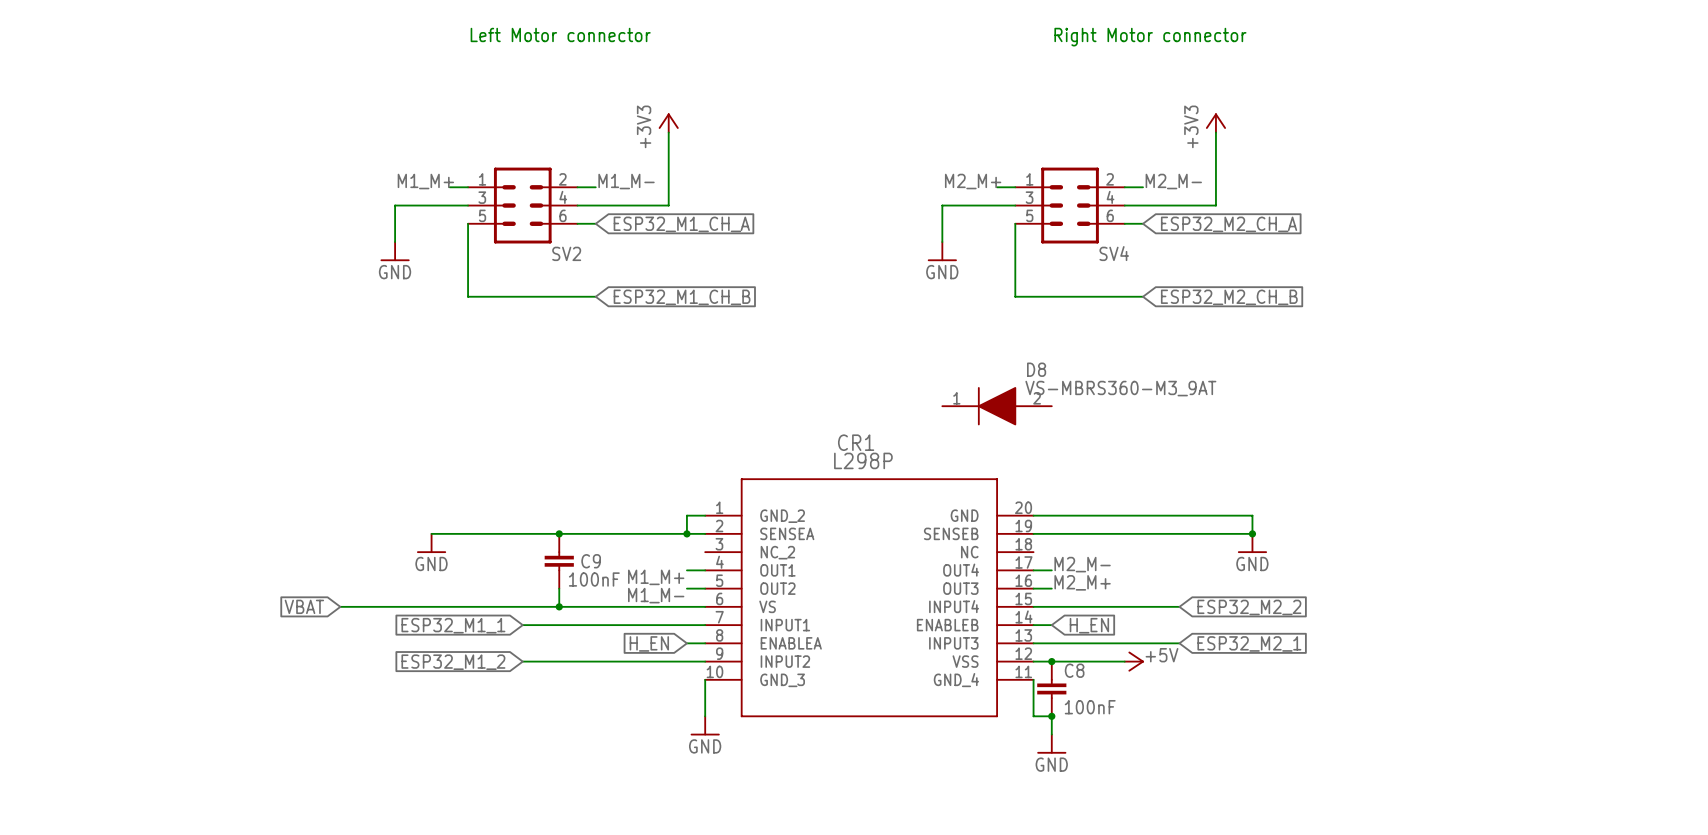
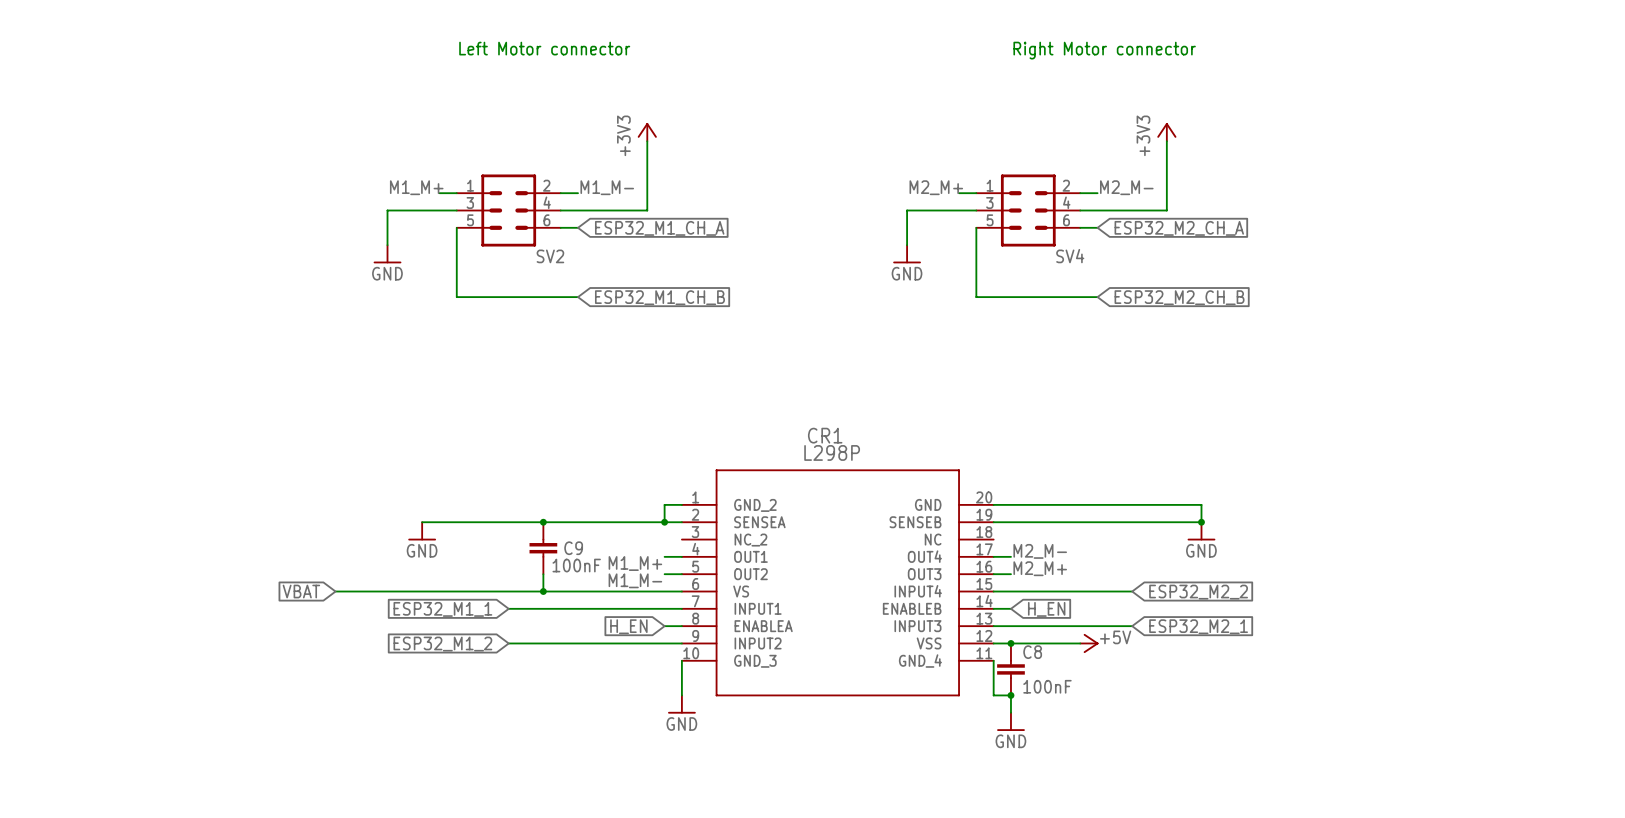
D8: VS-MBRS360-M3_9AT (997, 406) -> none

